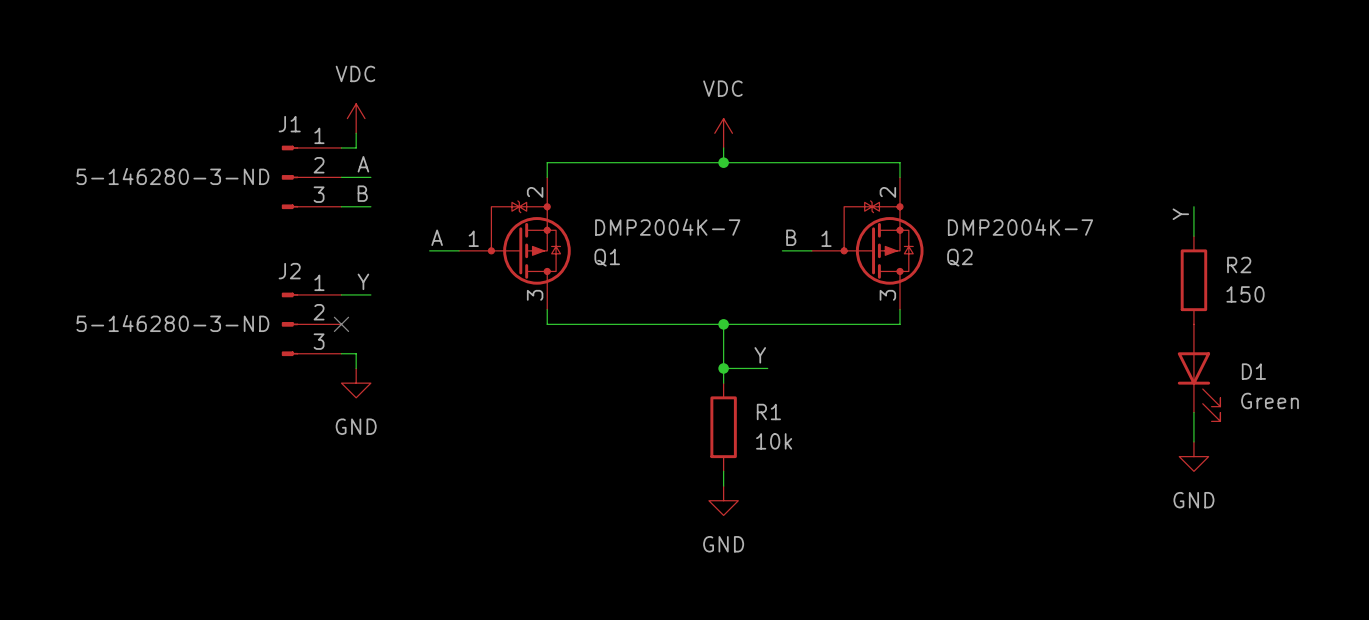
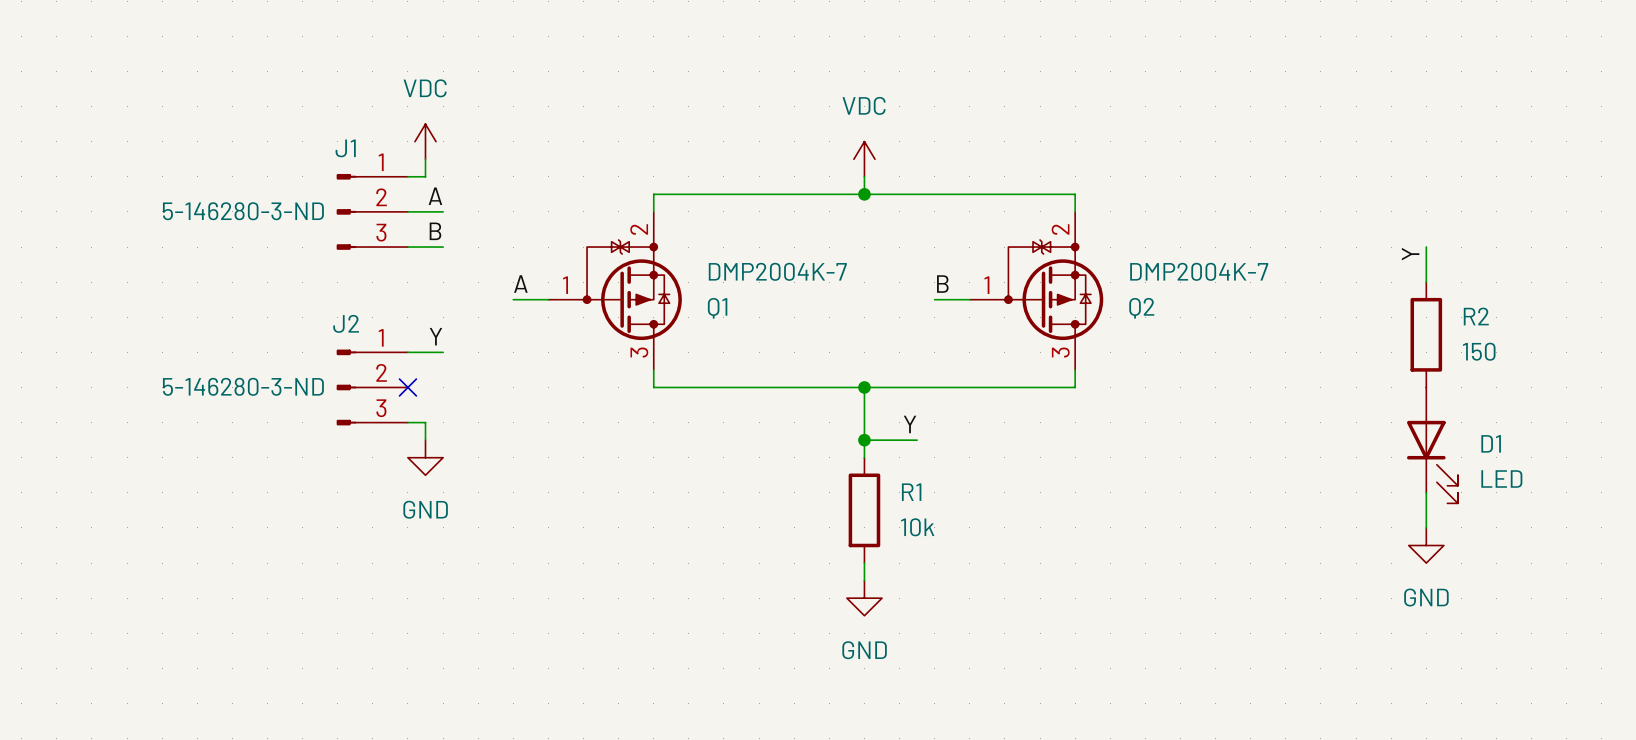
D1 value: Green (1270, 400) -> LED (1501, 479)

